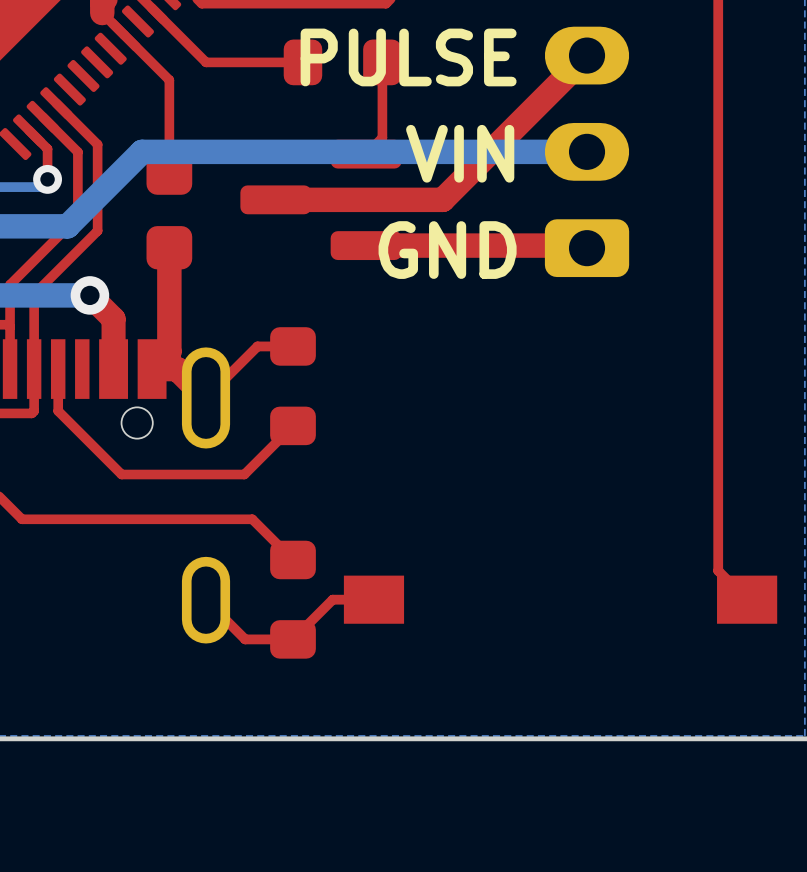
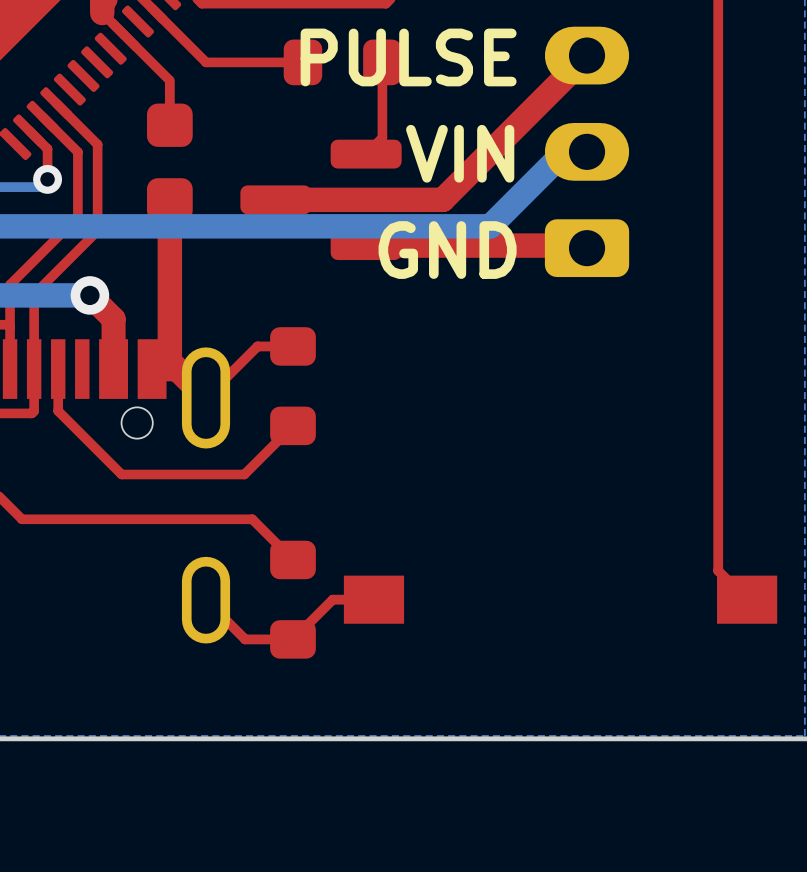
top track: (169, 80) (169, 173) -> (169, 80) (169, 125)
bottom track: (564, 151) (142, 151) (67, 226) -> (564, 151) (490, 226) (67, 226)
top track: none -> (169, 199) (169, 361) (177, 369)
part position: (169, 210) -> (169, 162)
top track: (169, 247) (169, 351) (152, 369) -> none

